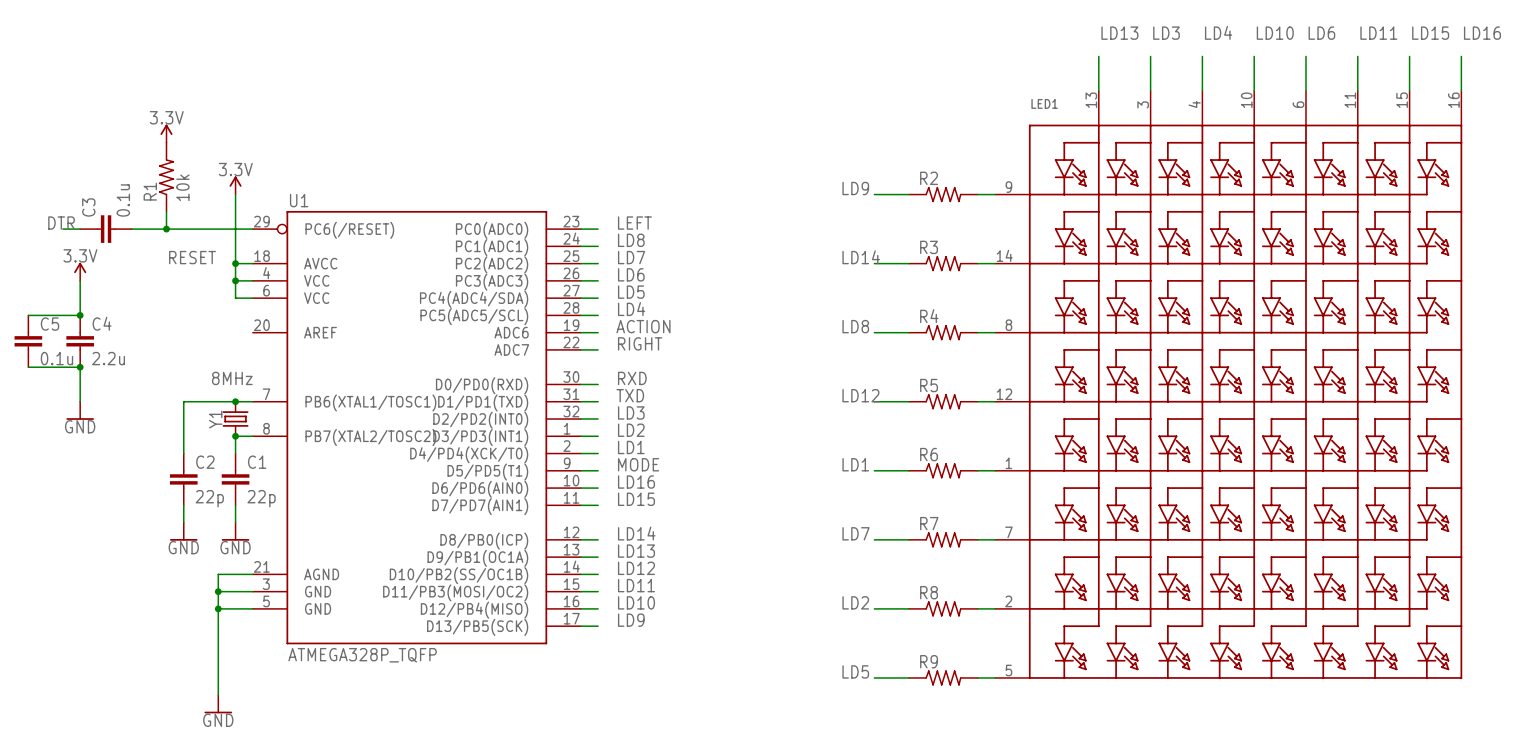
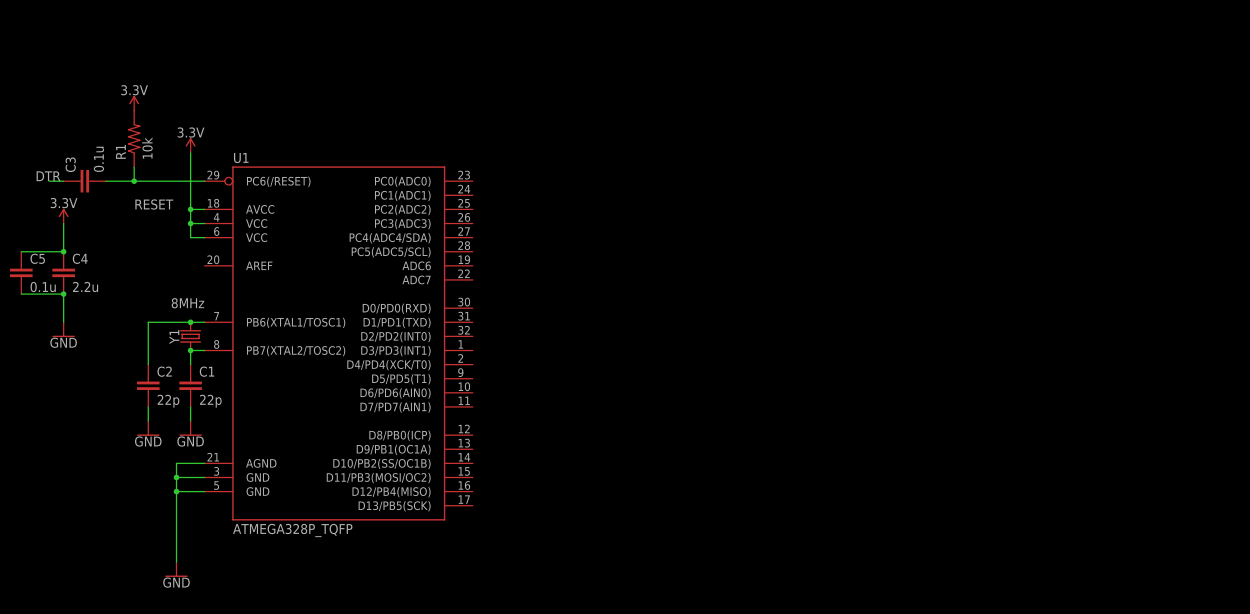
label: LD4 (1218, 32) -> none
label: LD13 (1119, 33) -> none
label: LD3 (1166, 33) -> none
label: LD10 (1275, 33) -> none
label: LD6 (1321, 33) -> none
label: LD11 (1378, 33) -> none
label: LD15 (1430, 33) -> none
label: LD16 (1482, 33) -> none
wire: (1098, 56) (1098, 90) -> none
wire: (1150, 56) (1150, 90) -> none
wire: (1202, 56) (1202, 90) -> none
wire: (1254, 56) (1254, 90) -> none
wire: (1305, 56) (1305, 90) -> none
wire: (1357, 56) (1357, 90) -> none
wire: (1409, 56) (1409, 90) -> none
wire: (1461, 56) (1461, 90) -> none
label: LD9 (855, 188) -> none
wire: (874, 194) (908, 194) -> none
R2: (943, 194) -> none
wire: (977, 194) (995, 194) -> none
label: LEFT (634, 223) -> none
wire: (580, 229) (598, 229) -> none
label: LD8 (631, 240) -> none
wire: (580, 246) (598, 246) -> none
label: LD7 (631, 257) -> none
label: LD14 (861, 257) -> none
wire: (580, 263) (598, 263) -> none
wire: (874, 263) (908, 263) -> none
R3: (943, 263) -> none
wire: (977, 263) (995, 263) -> none
label: LD6 (631, 274) -> none
wire: (580, 280) (598, 280) -> none
label: LD5 (631, 292) -> none
wire: (580, 298) (598, 298) -> none
label: LD4 (631, 309) -> none
wire: (580, 315) (598, 315) -> none
label: ACTION (643, 326) -> none
label: LD8 (855, 326) -> none
wire: (580, 332) (598, 332) -> none
wire: (874, 332) (908, 332) -> none
R4: (943, 332) -> none
wire: (977, 332) (995, 332) -> none
label: RIGHT (640, 343) -> none
wire: (580, 349) (598, 349) -> none
label: RXD (632, 378) -> none
wire: (580, 384) (598, 384) -> none
LED1: (1228, 384) -> none
label: TXD (630, 395) -> none
label: LD12 (860, 395) -> none
wire: (580, 401) (598, 401) -> none
wire: (874, 401) (908, 401) -> none
R5: (943, 401) -> none
wire: (977, 401) (995, 401) -> none
label: LD3 (631, 412) -> none
wire: (580, 419) (598, 419) -> none
label: LD2 (631, 430) -> none
wire: (580, 436) (598, 436) -> none
label: LD1 (631, 447) -> none
wire: (580, 453) (598, 453) -> none
label: MODE (638, 464) -> none
label: LD1 (855, 464) -> none
wire: (580, 470) (598, 470) -> none
wire: (874, 470) (908, 470) -> none
R6: (943, 470) -> none
wire: (977, 470) (995, 470) -> none
label: LD16 (636, 482) -> none
wire: (580, 488) (598, 488) -> none
label: LD15 (636, 499) -> none
wire: (580, 505) (598, 505) -> none
label: LD14 (636, 533) -> none
label: LD7 (856, 533) -> none
wire: (580, 539) (598, 539) -> none
wire: (874, 539) (908, 539) -> none
R7: (943, 539) -> none
wire: (977, 539) (995, 539) -> none
label: LD13 (636, 551) -> none
wire: (580, 557) (598, 557) -> none
label: LD12 (636, 568) -> none
wire: (580, 574) (598, 574) -> none
label: LD11 (636, 585) -> none
wire: (580, 591) (598, 591) -> none
label: LD10 (636, 602) -> none
label: LD2 (855, 602) -> none
wire: (580, 608) (598, 608) -> none
wire: (874, 608) (908, 608) -> none
R8: (943, 608) -> none
wire: (977, 608) (995, 608) -> none
label: LD9 (631, 620) -> none
wire: (580, 626) (598, 626) -> none
label: LD5 (855, 671) -> none
wire: (874, 677) (908, 677) -> none
R9: (943, 677) -> none
wire: (977, 677) (995, 677) -> none

